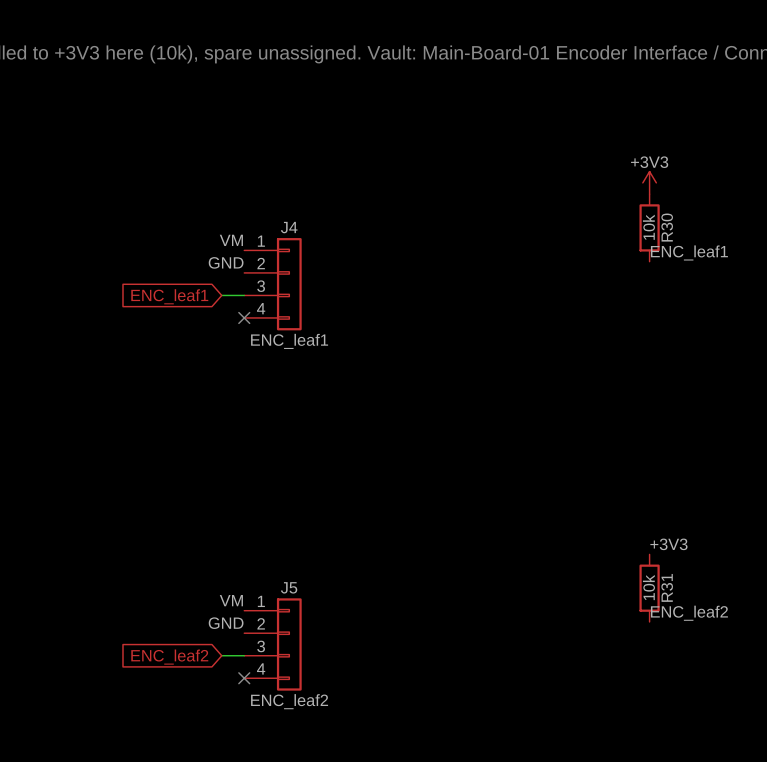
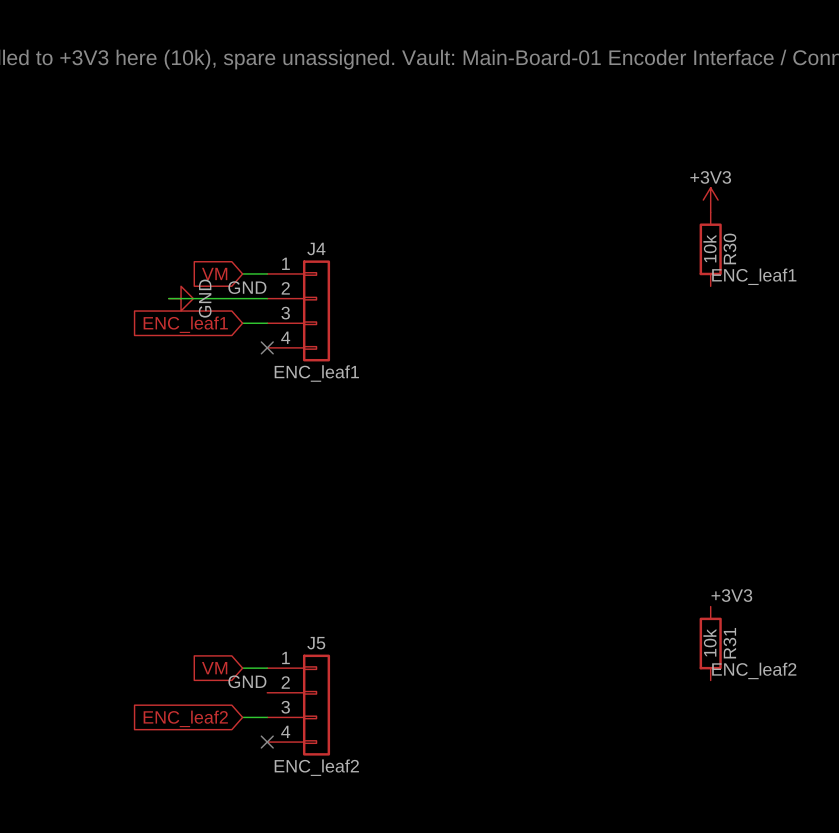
label: VM (231, 240) -> none
global label: none -> VM (214, 273)
wire: none -> (242, 273) (267, 273)
wire: none -> (168, 298) (267, 298)
power symbol: none -> GND (181, 298)
label: VM (231, 600) -> none
global label: none -> VM (214, 668)
wire: none -> (242, 668) (267, 668)

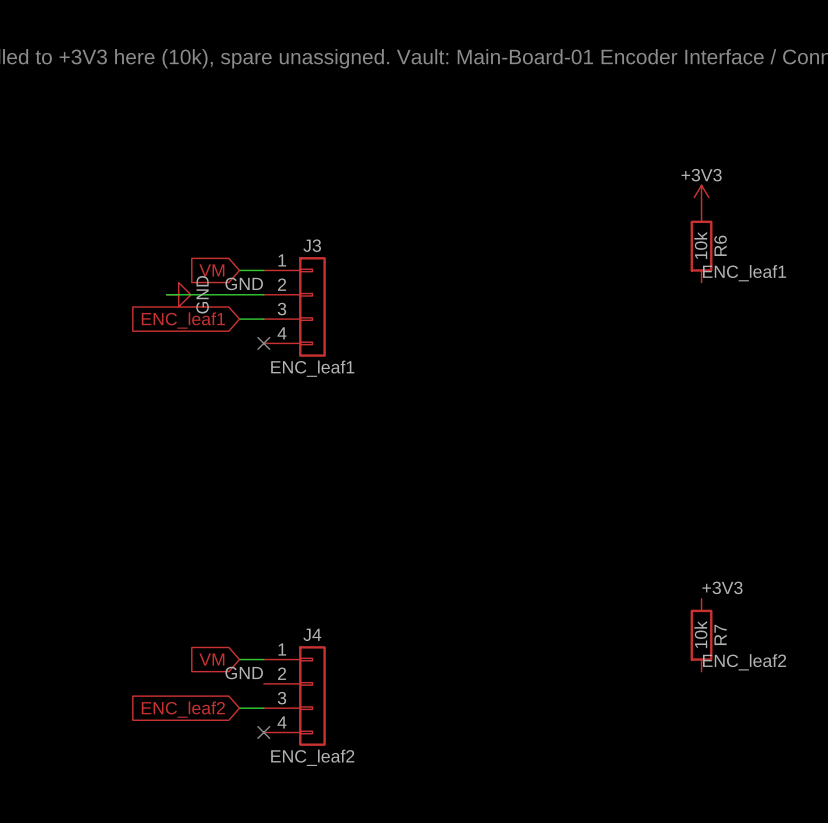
J4 name: J4 (316, 248) -> J3 (312, 245)
R30 name: R30 (729, 248) -> R6 (720, 245)
J5 name: J5 (316, 643) -> J4 (312, 634)
R31 name: R31 (729, 643) -> R7 (720, 634)

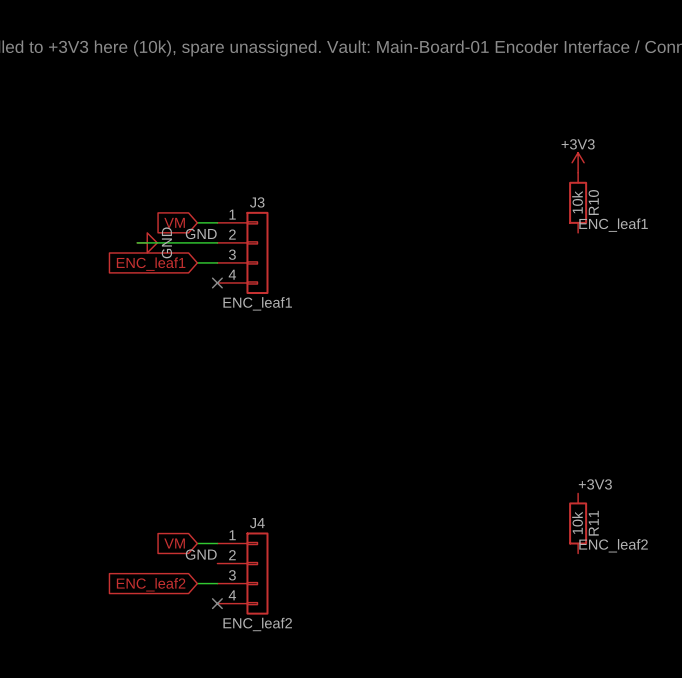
R6 name: R6 (720, 245) -> R10 (593, 202)
R7 name: R7 (720, 634) -> R11 (593, 523)

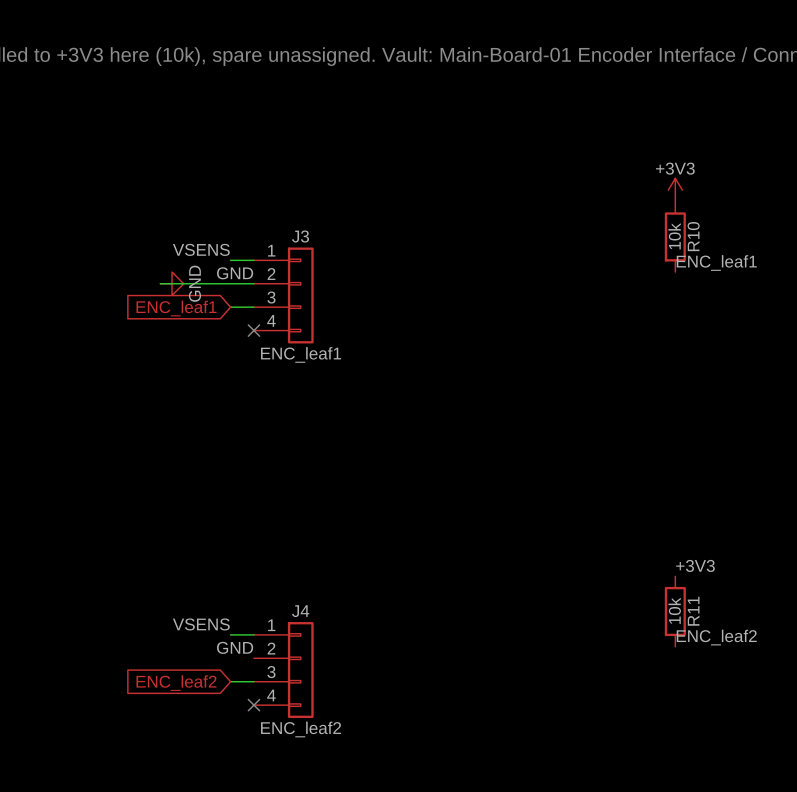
label: none -> VSENS (201, 249)
global label: VM (174, 222) -> none
label: none -> VSENS (201, 624)
global label: VM (174, 543) -> none

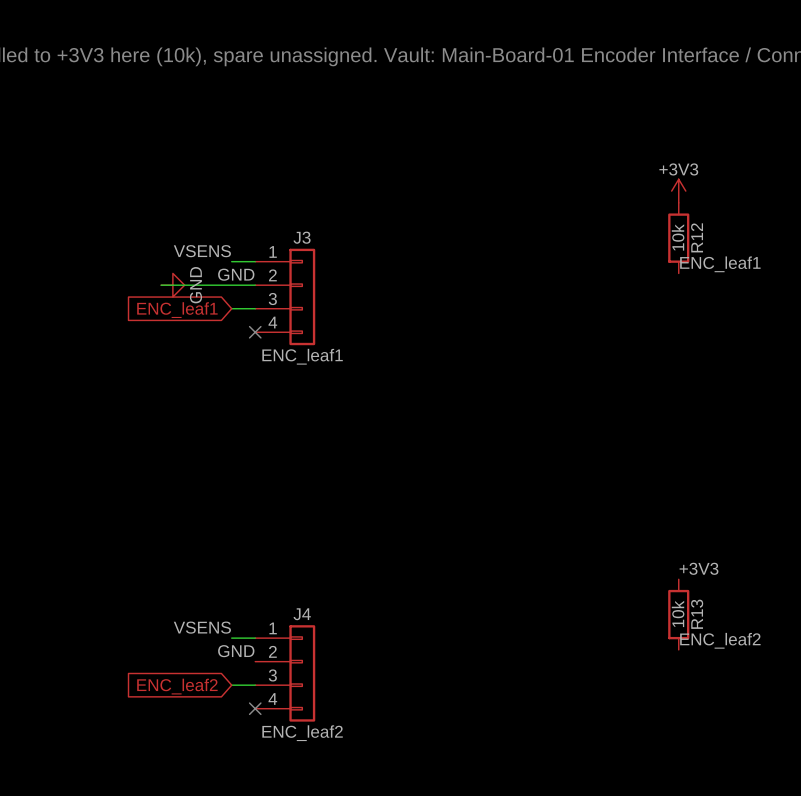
R10 name: R10 (693, 236) -> R12 (697, 237)
R11 name: R11 (693, 611) -> R13 (697, 614)

